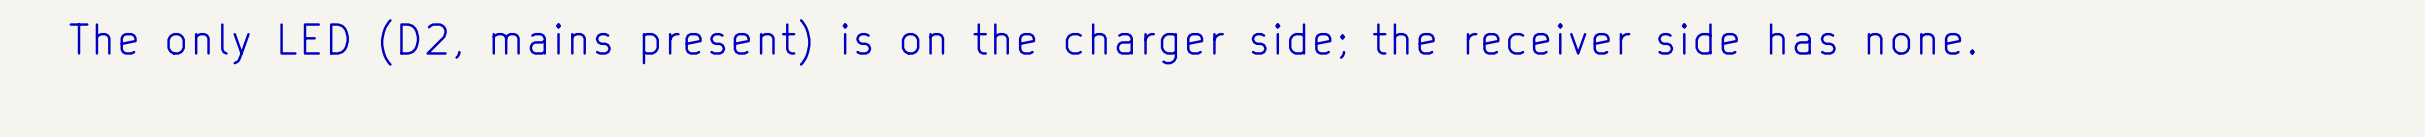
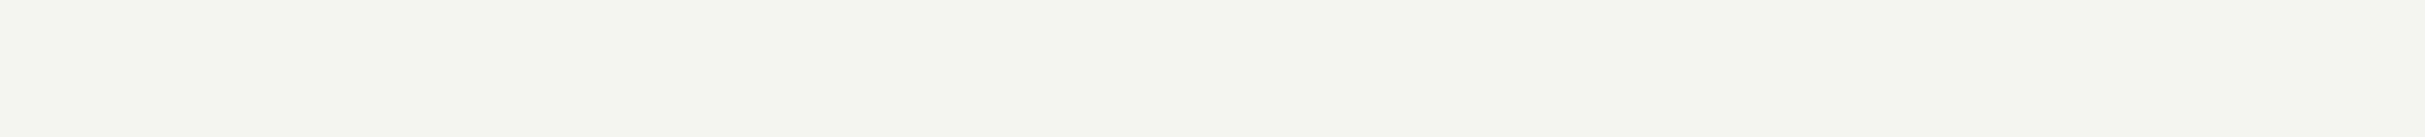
text: The only LED (D2, mains present) is on the charger side; the receiver side has none. (1022, 42) -> none

